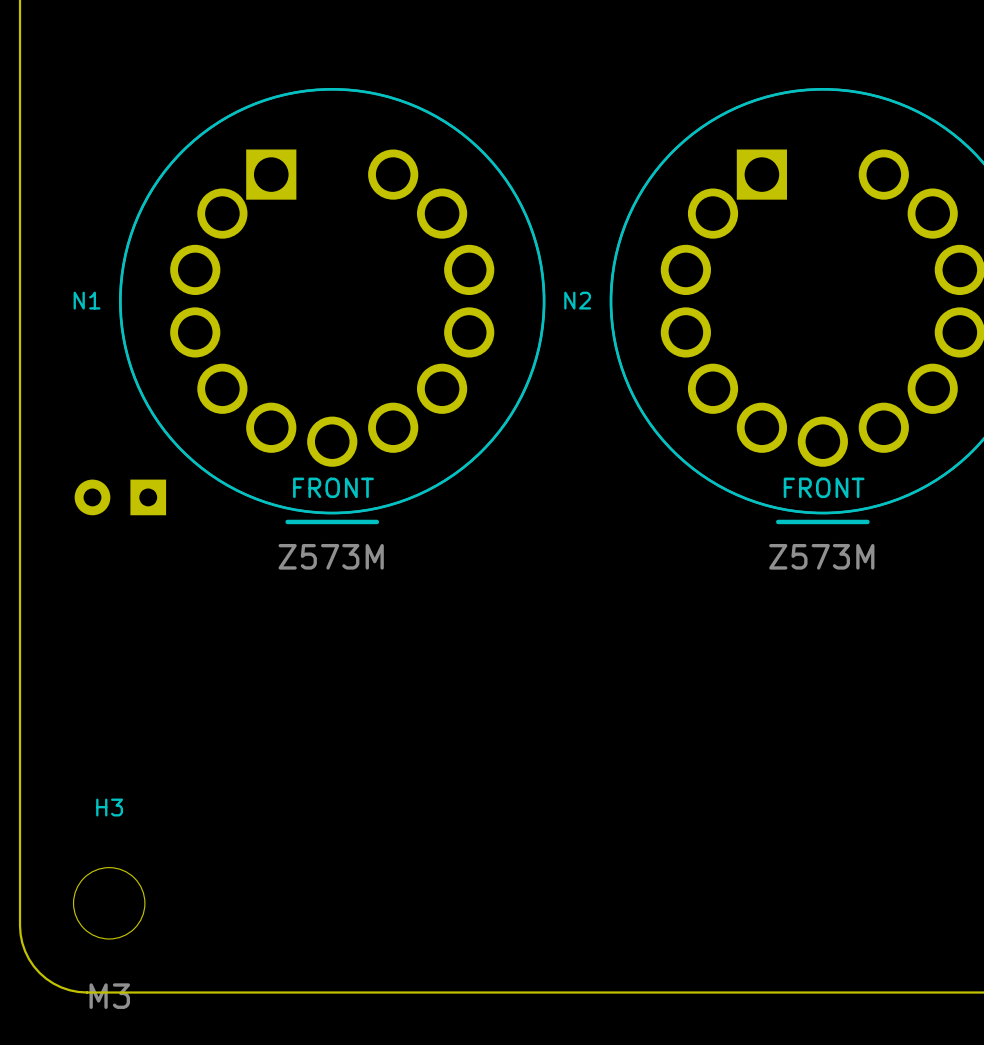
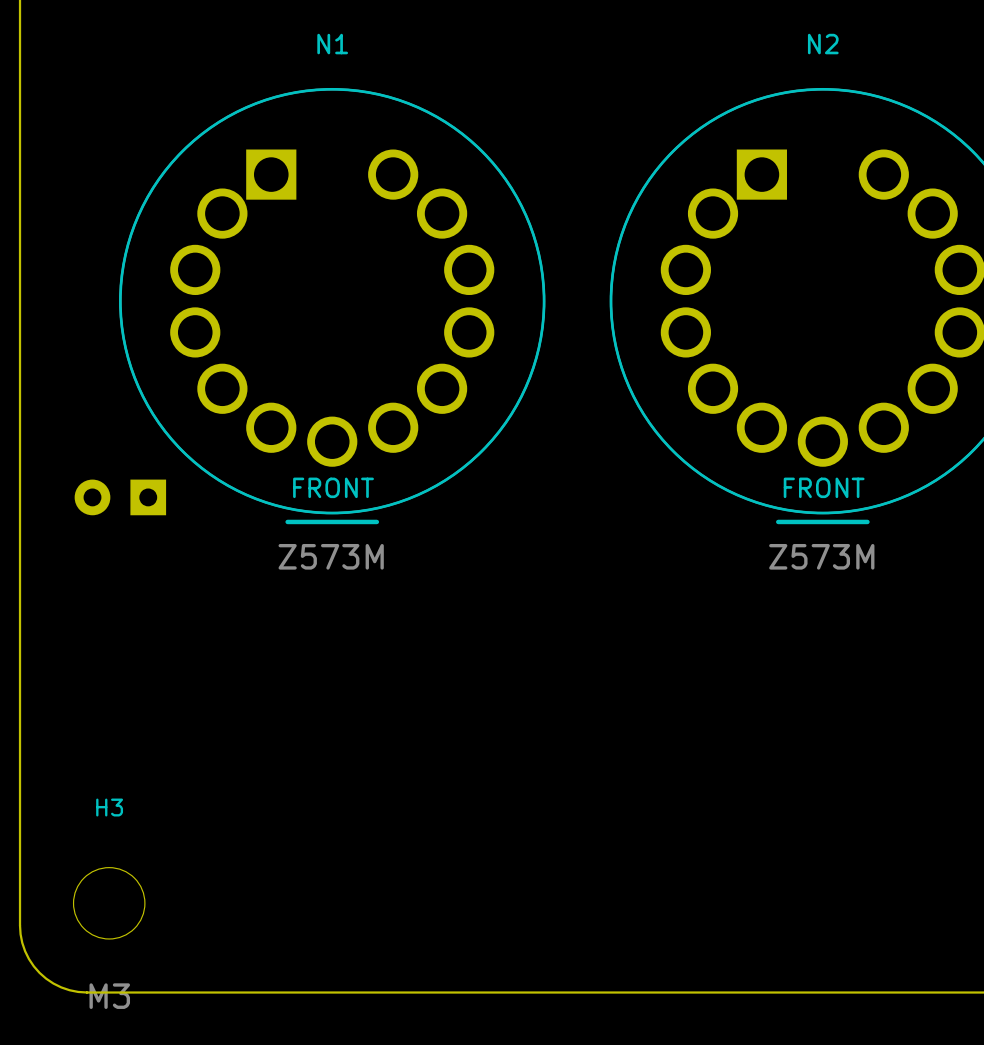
N1 name position: N1 (87, 300) -> N1 (332, 44)
N2 name position: N2 (577, 300) -> N2 (823, 44)

